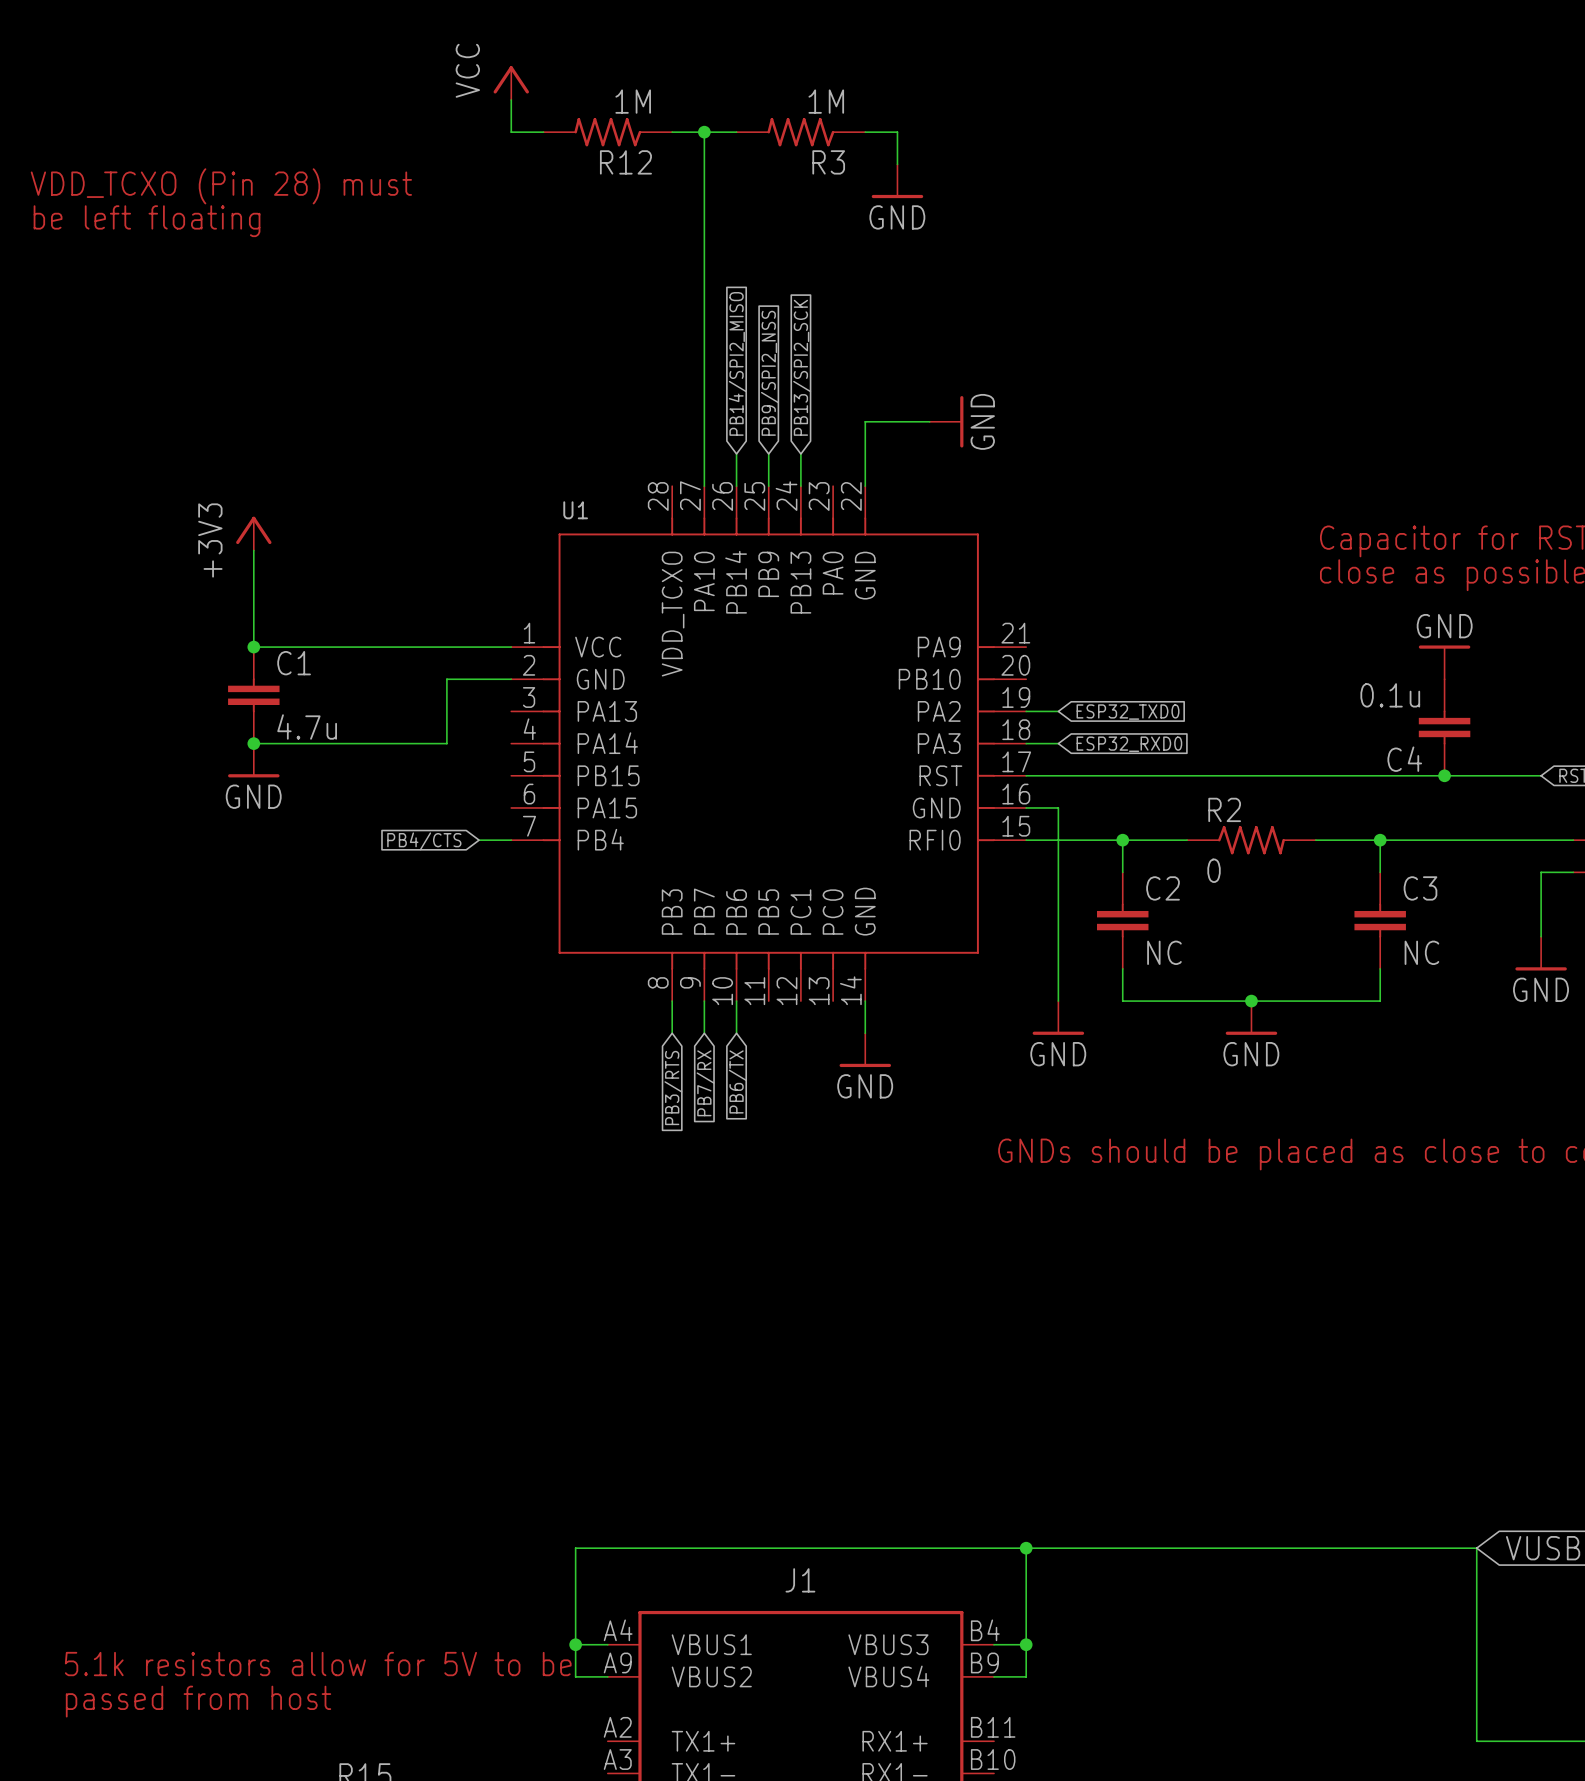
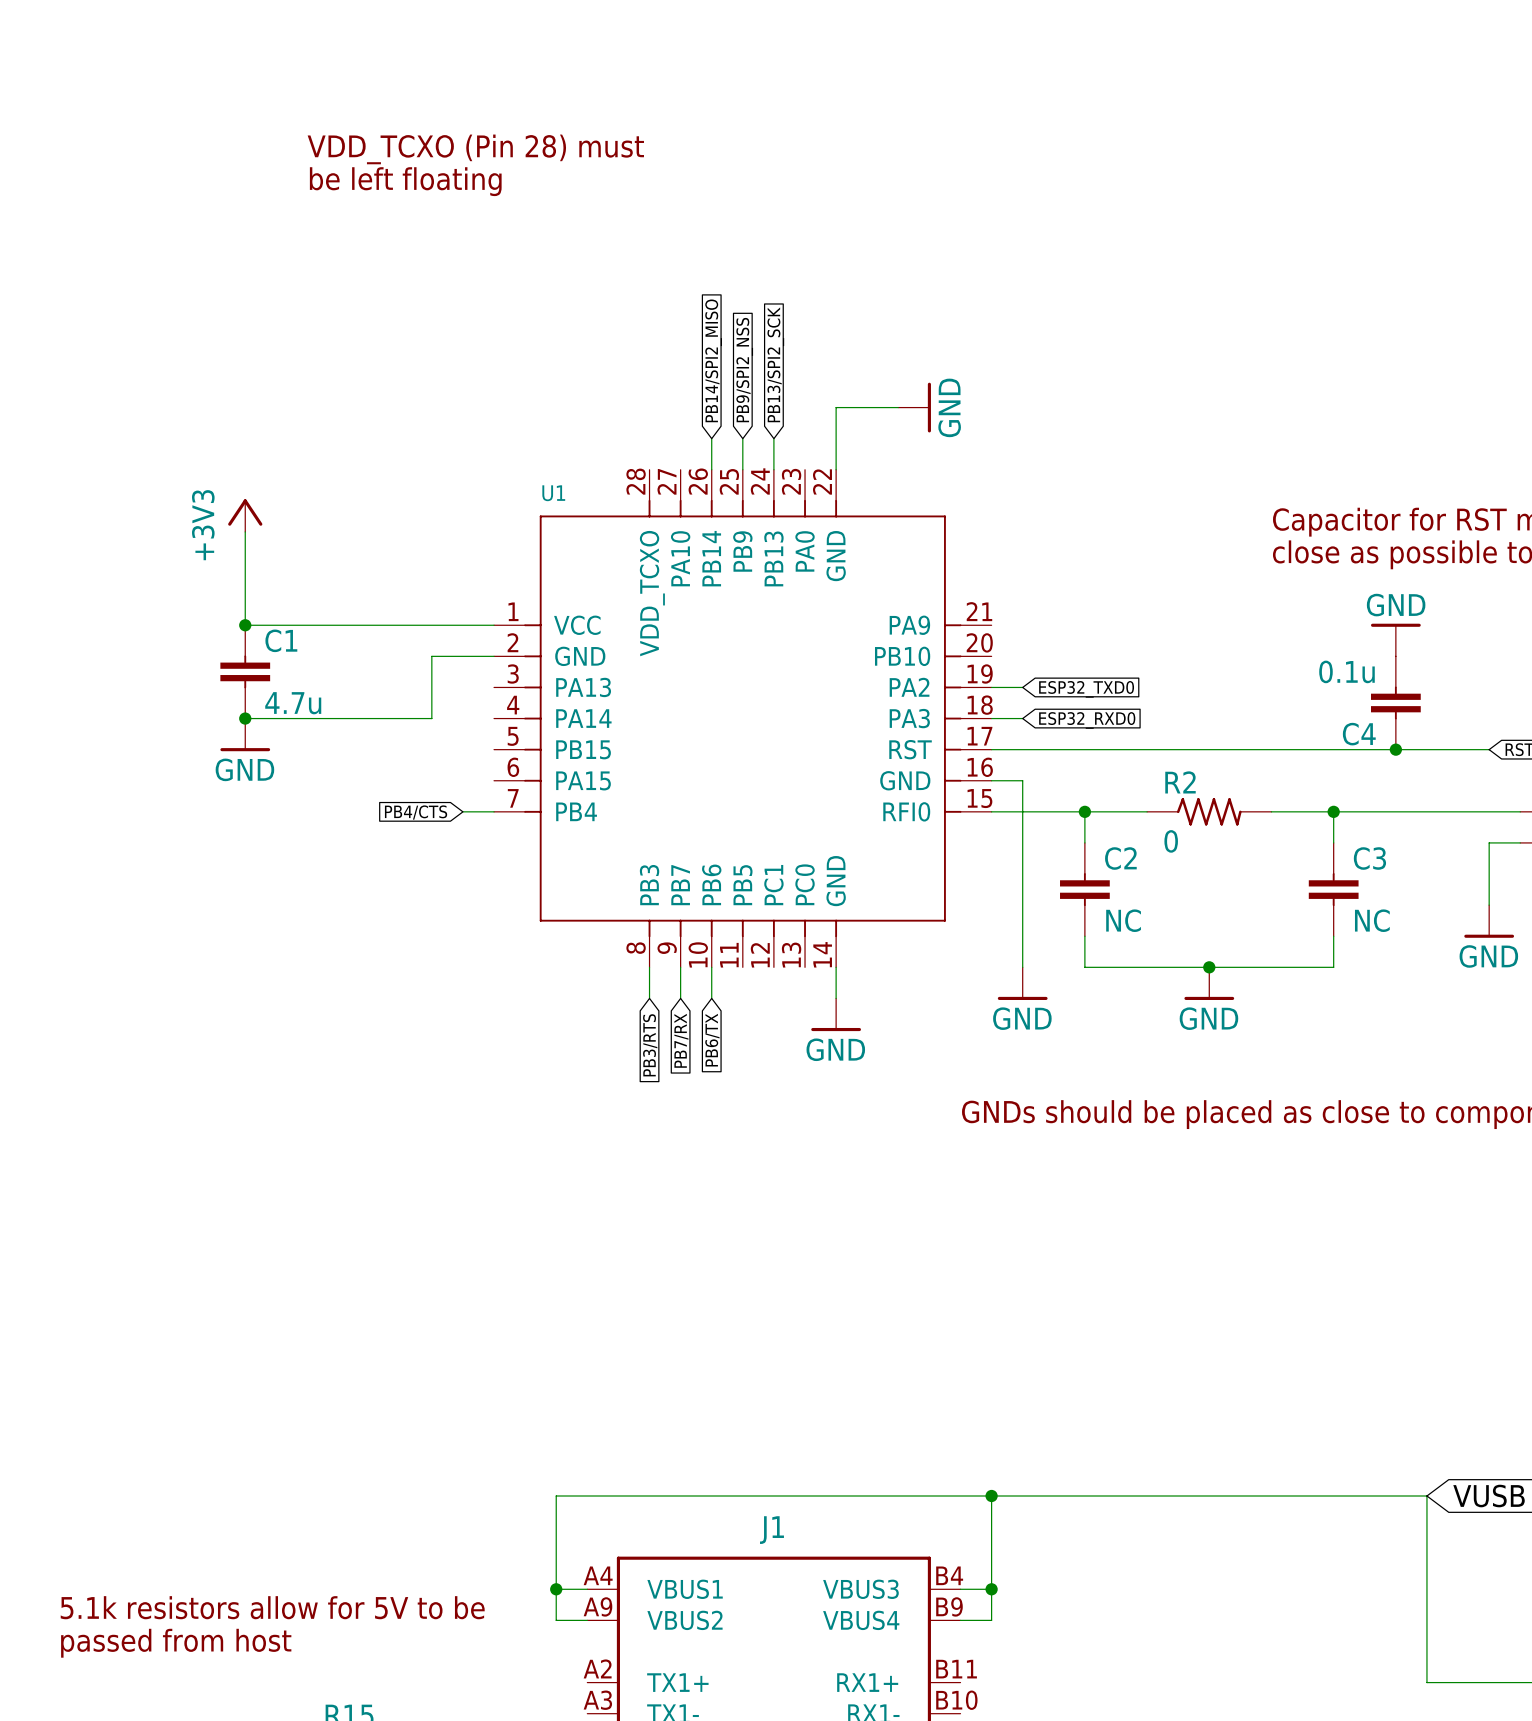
power symbol: VCC (511, 83) -> none
wire: (511, 99) (511, 132) (543, 132) -> none
R12: 1M (607, 132) -> none
wire: (672, 132) (736, 132) -> none
wire: (704, 132) (704, 486) -> none
junction: (704, 132) -> none
R3: 1M (800, 132) -> none
wire: (865, 132) (897, 132) (897, 164) -> none
power symbol: GND (897, 181) -> none
text position: VDD_TCXO (Pin 28) must (221, 186) -> VDD_TCXO (Pin 28) must (475, 149)
text position: be left floating (147, 221) -> be left floating (405, 181)

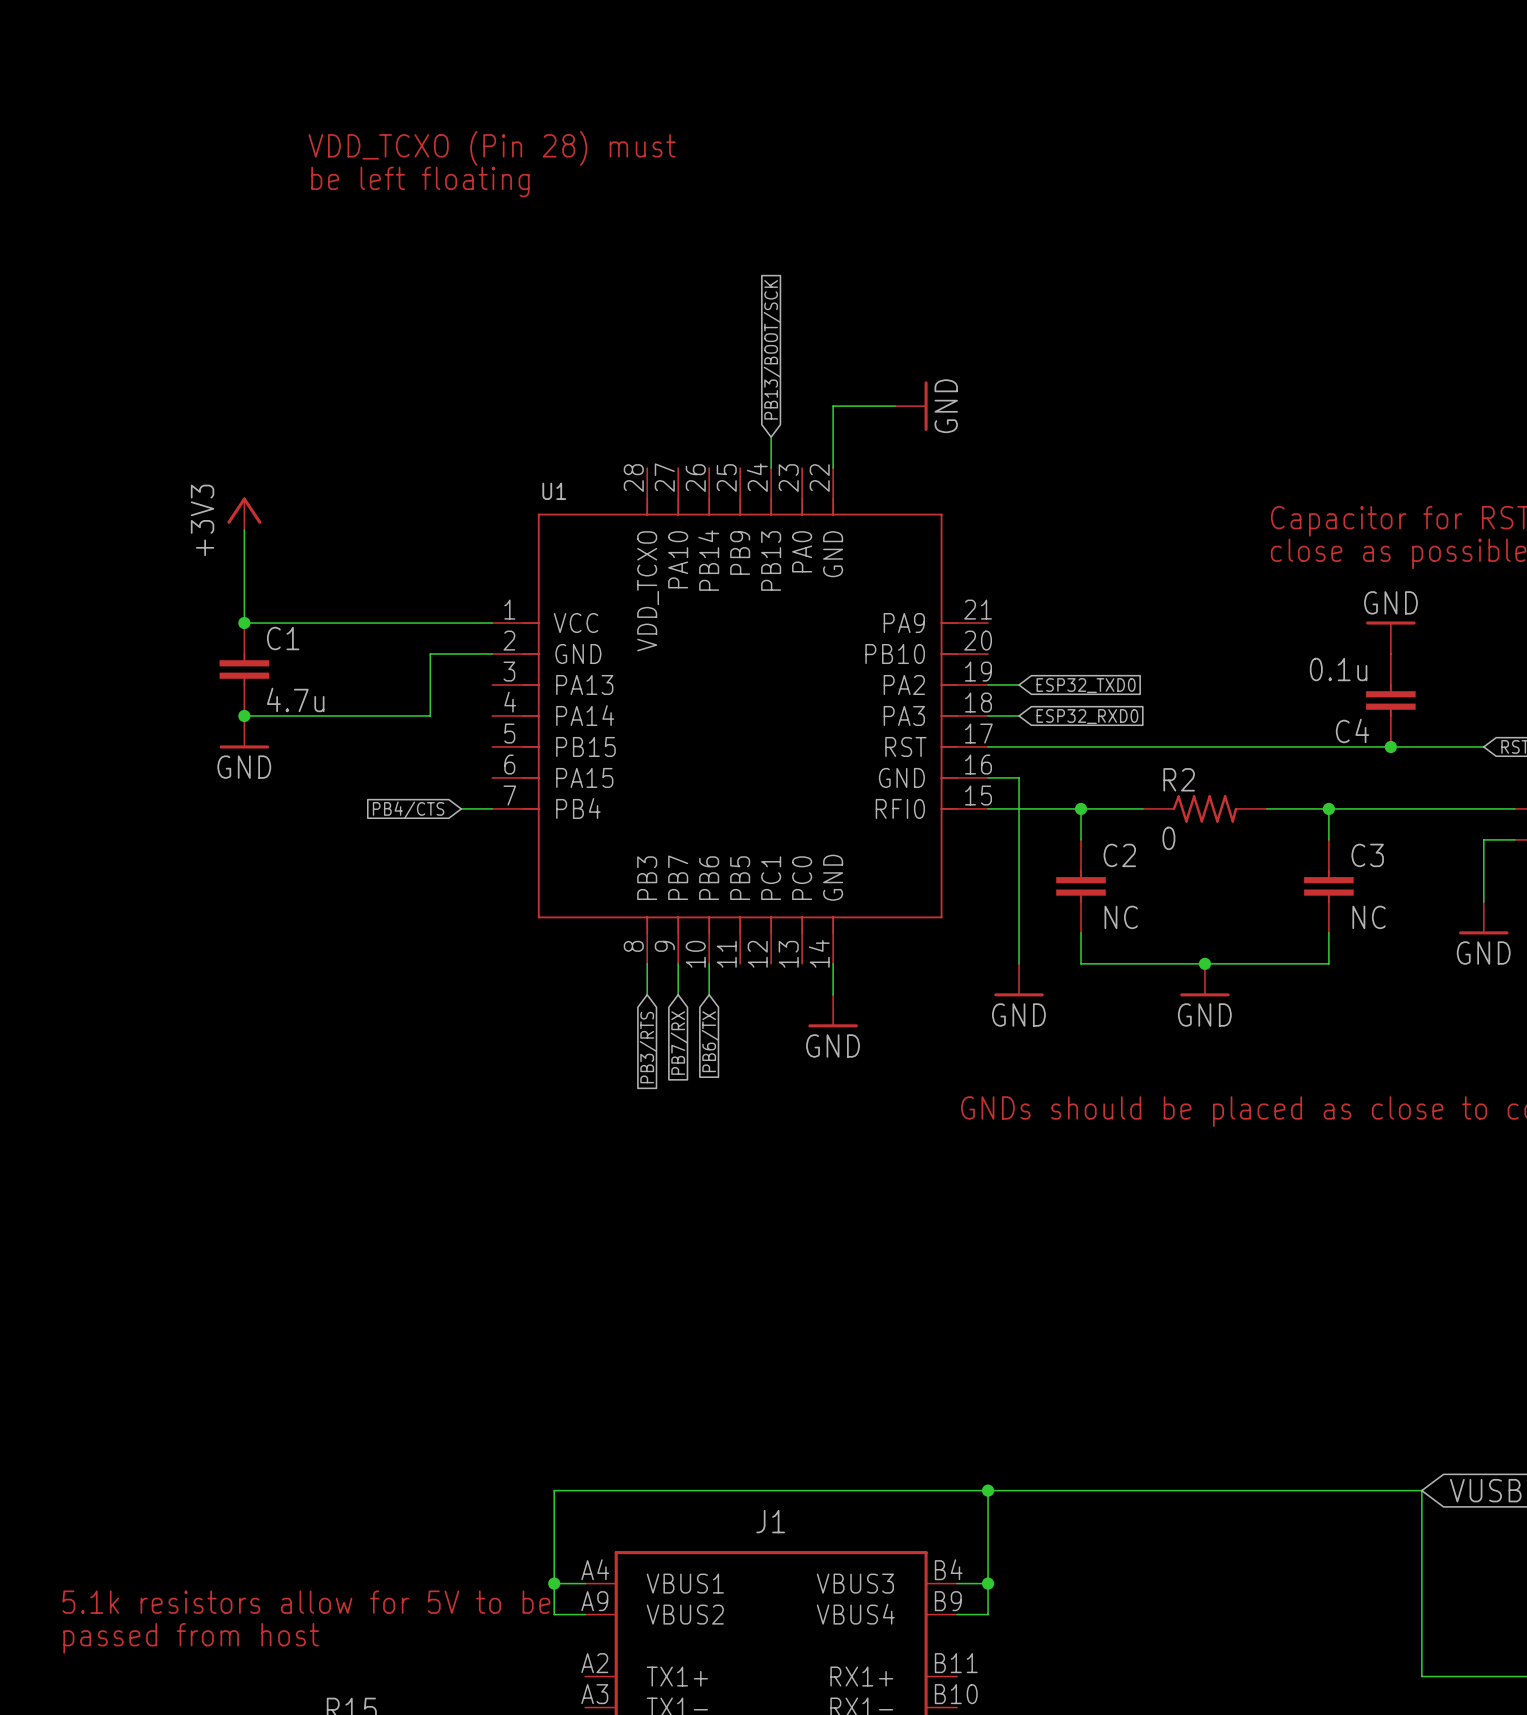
global label: PB14/SPI2_MISO (713, 360) -> none
global label: PB13/SPI2_SCK (775, 364) -> PB13/BOOT/SCK (772, 349)
global label: PB9/SPI2_NSS (744, 370) -> none
wire: (711, 438) (711, 469) -> none
wire: (742, 438) (742, 469) -> none

